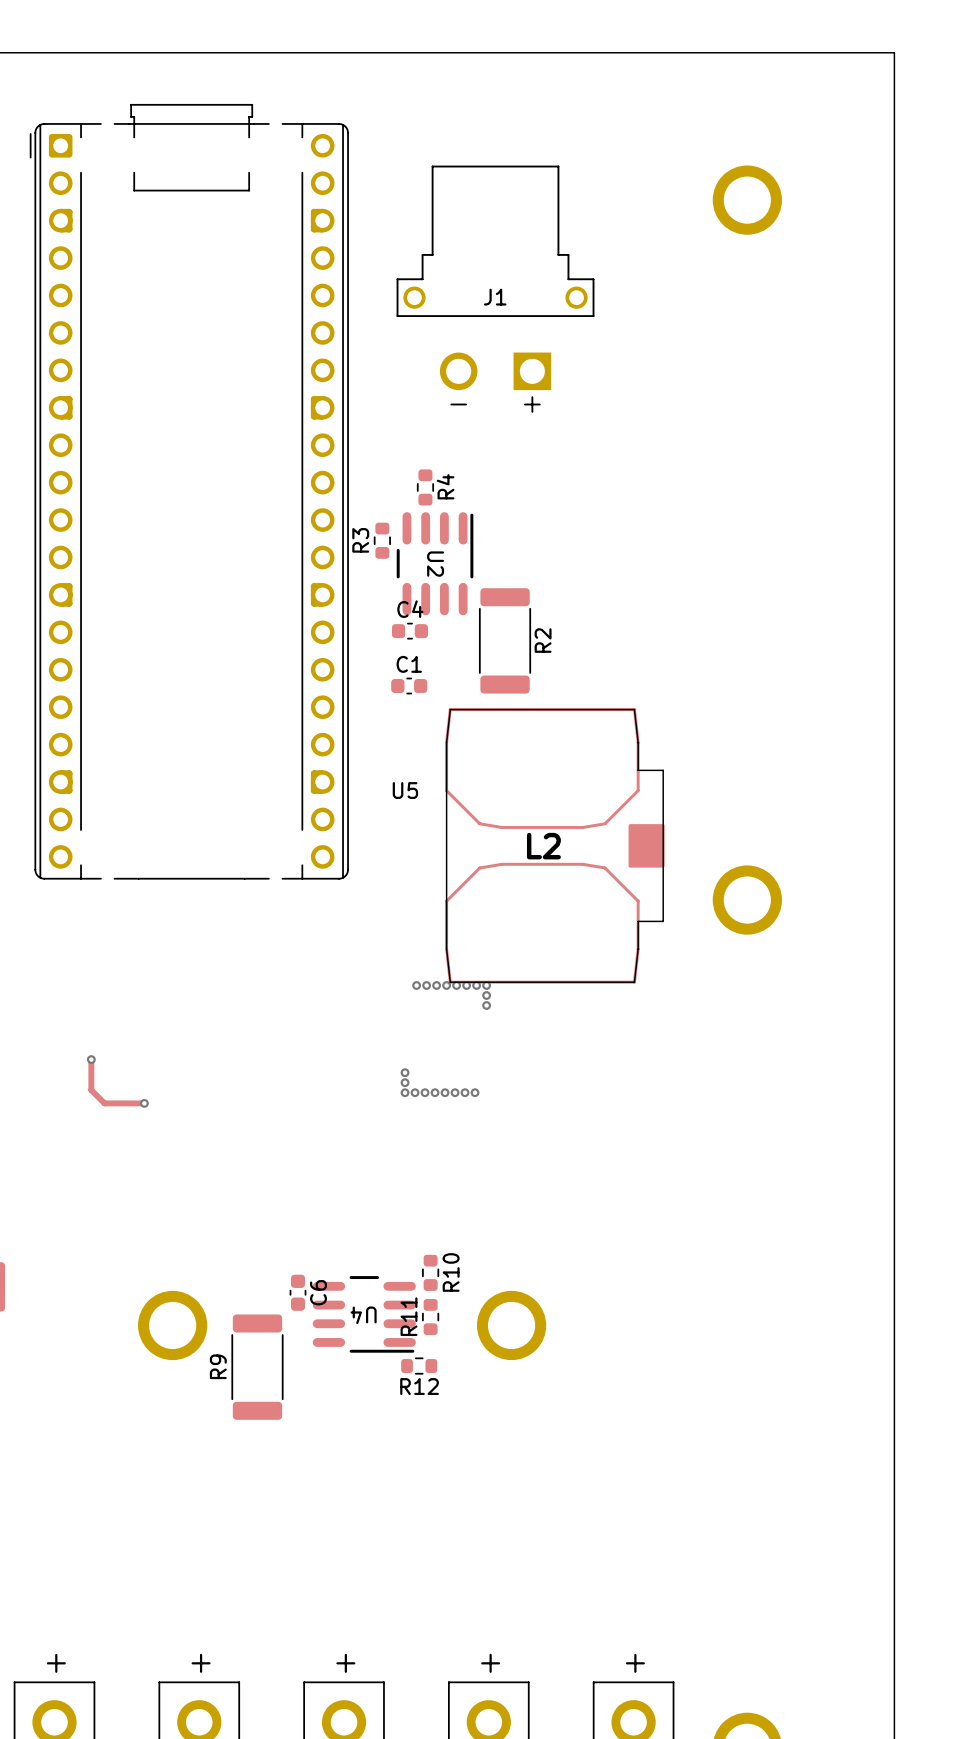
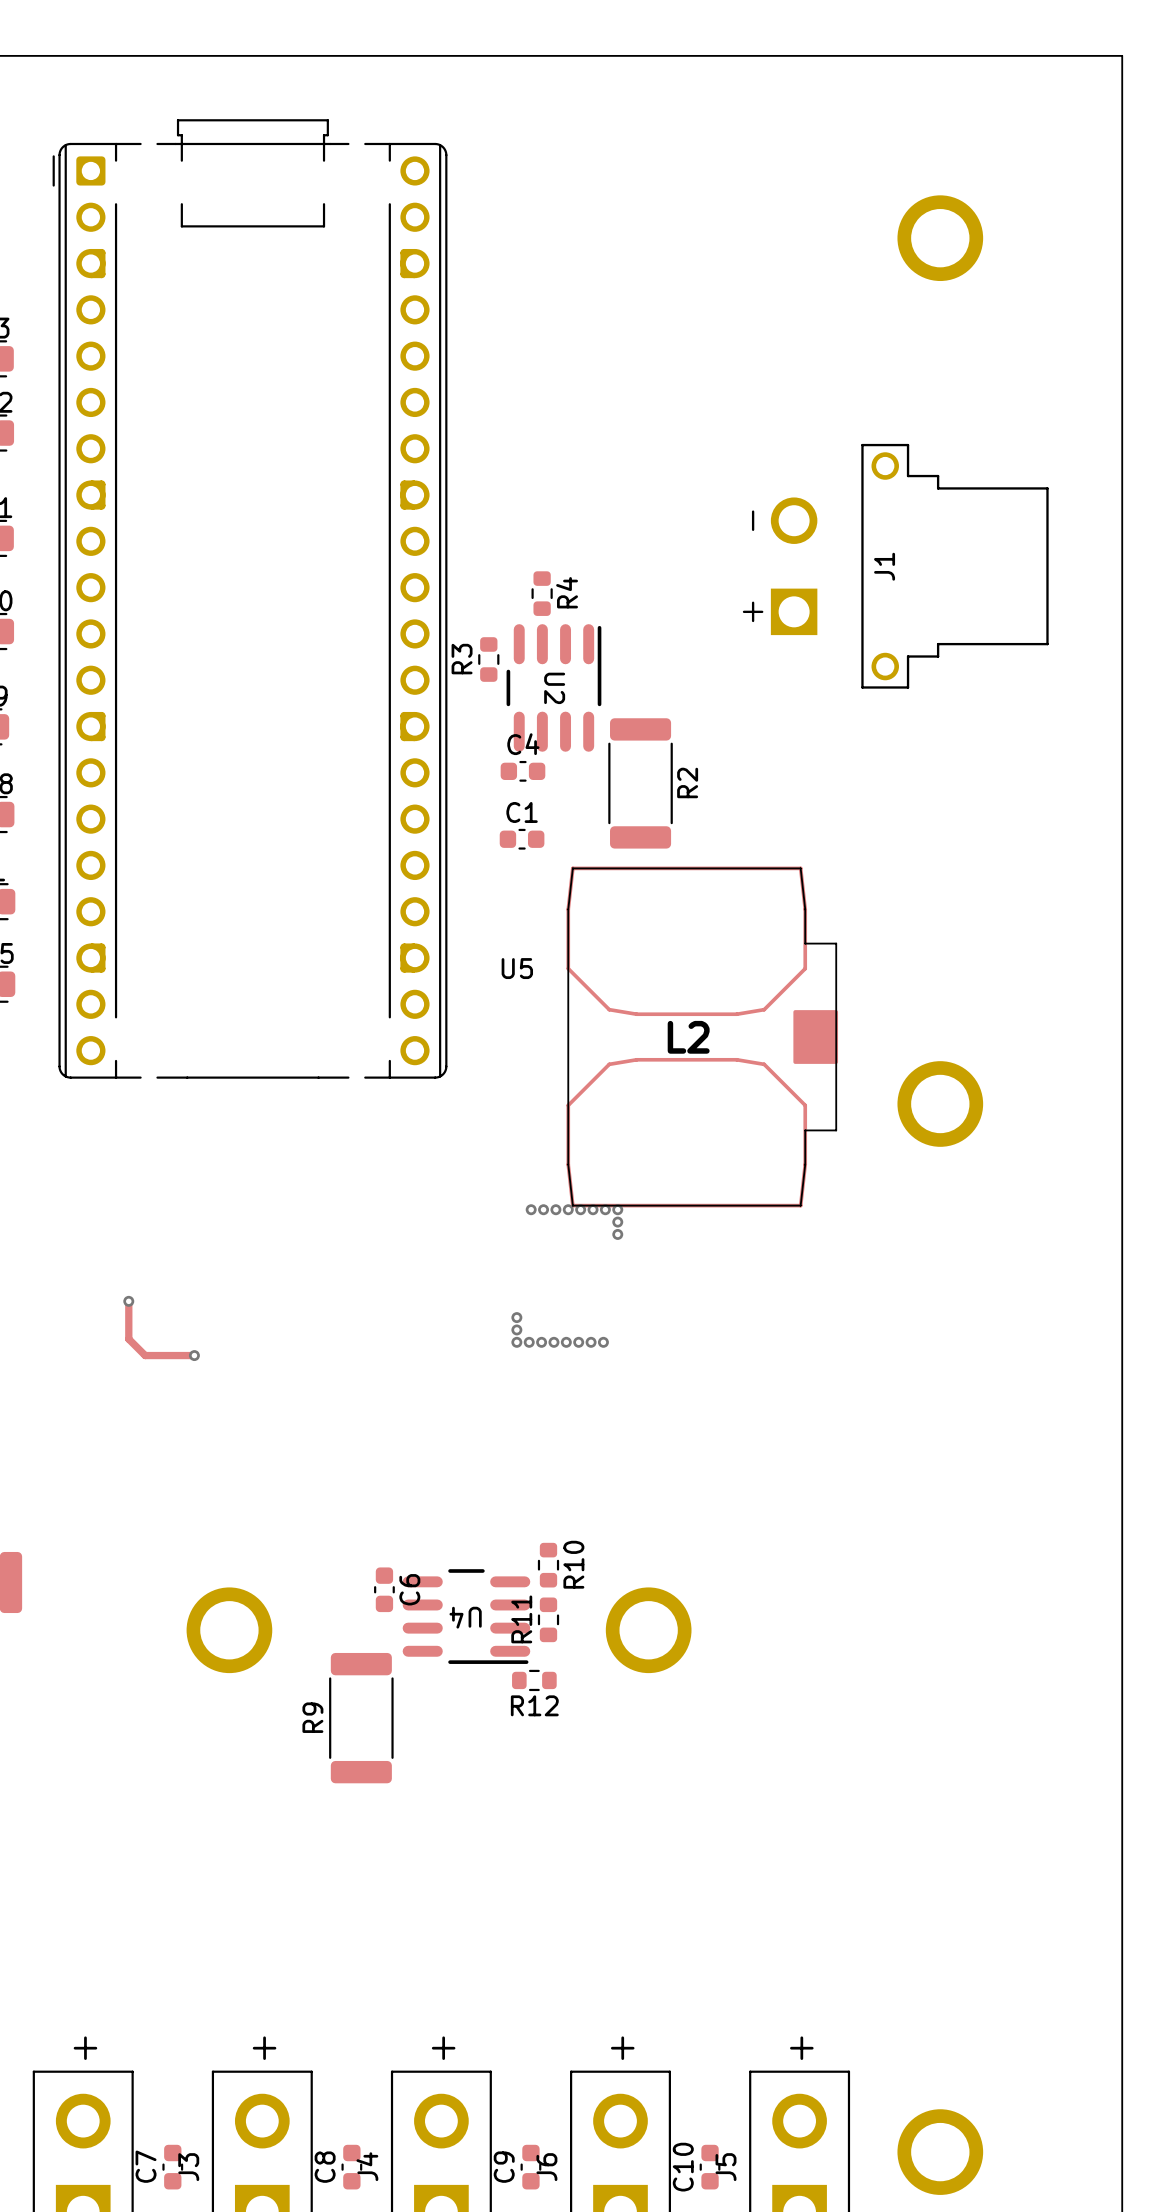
J1 rotation: 0° (495, 289) -> 90° clockwise (895, 566)
J1 position: (495, 289) -> (895, 566)
R9 position: (257, 1367) -> (361, 1718)

